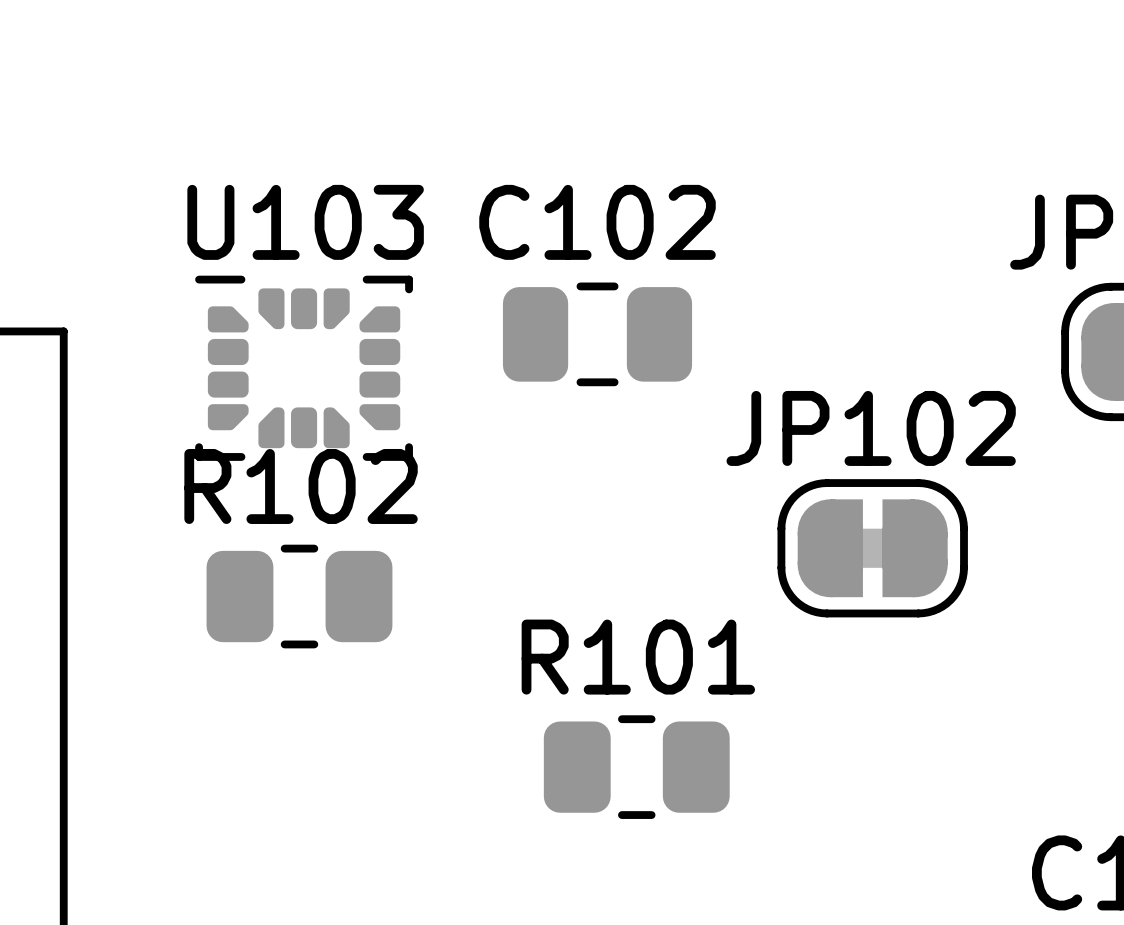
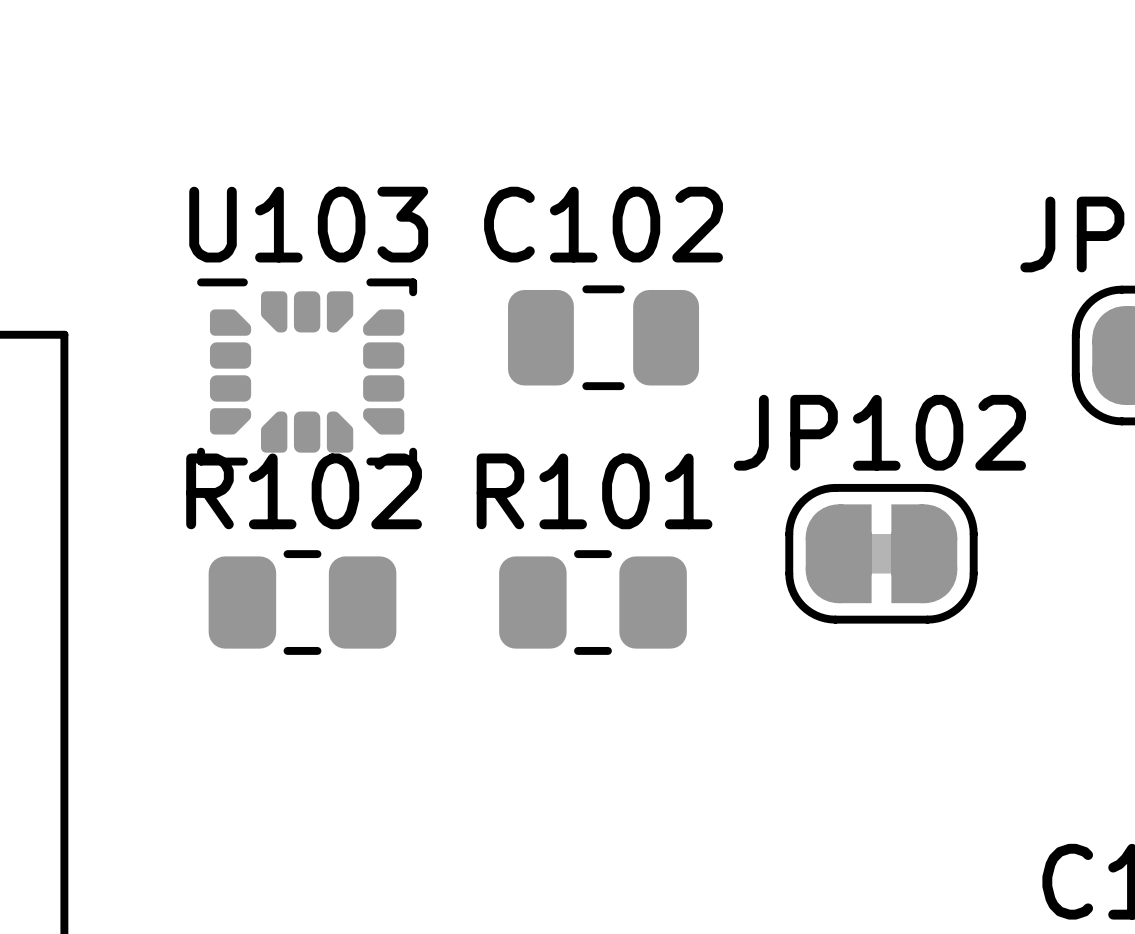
R101 position: (636, 767) -> (592, 602)

